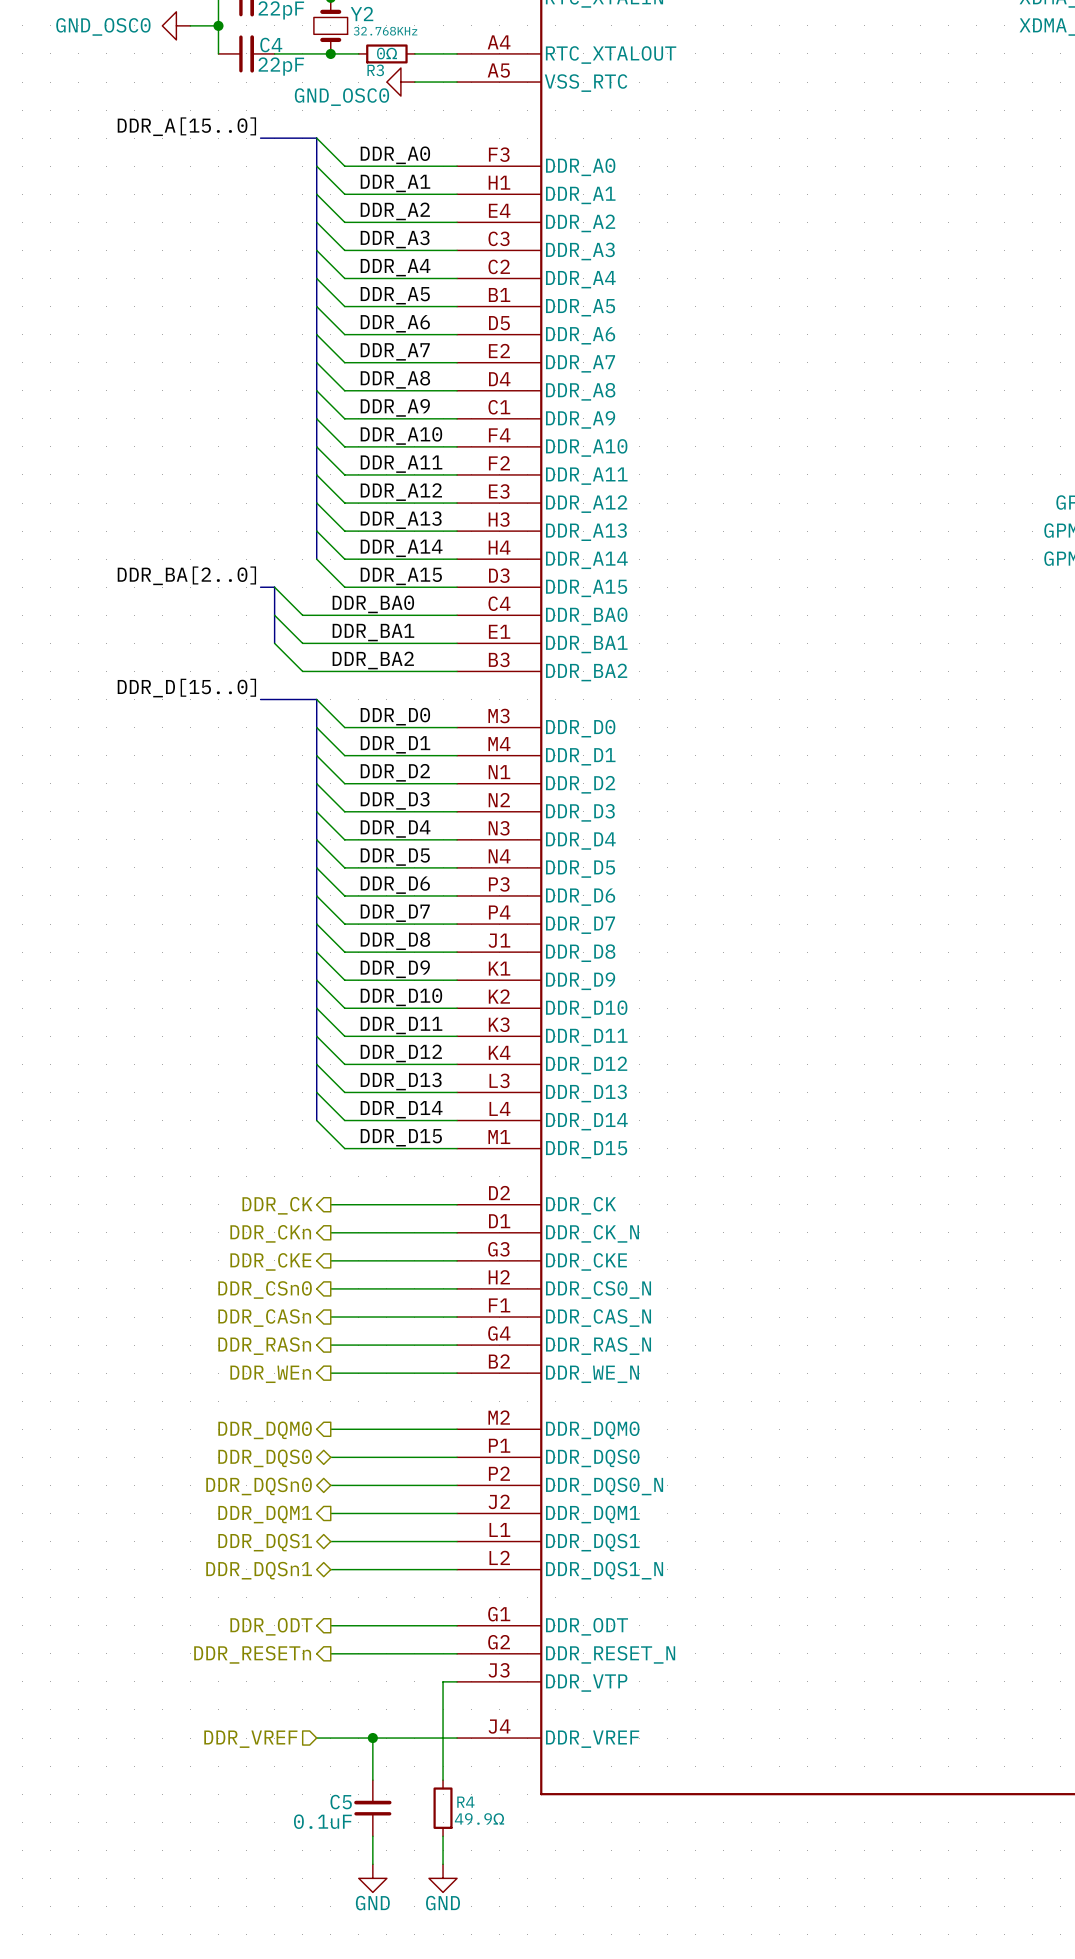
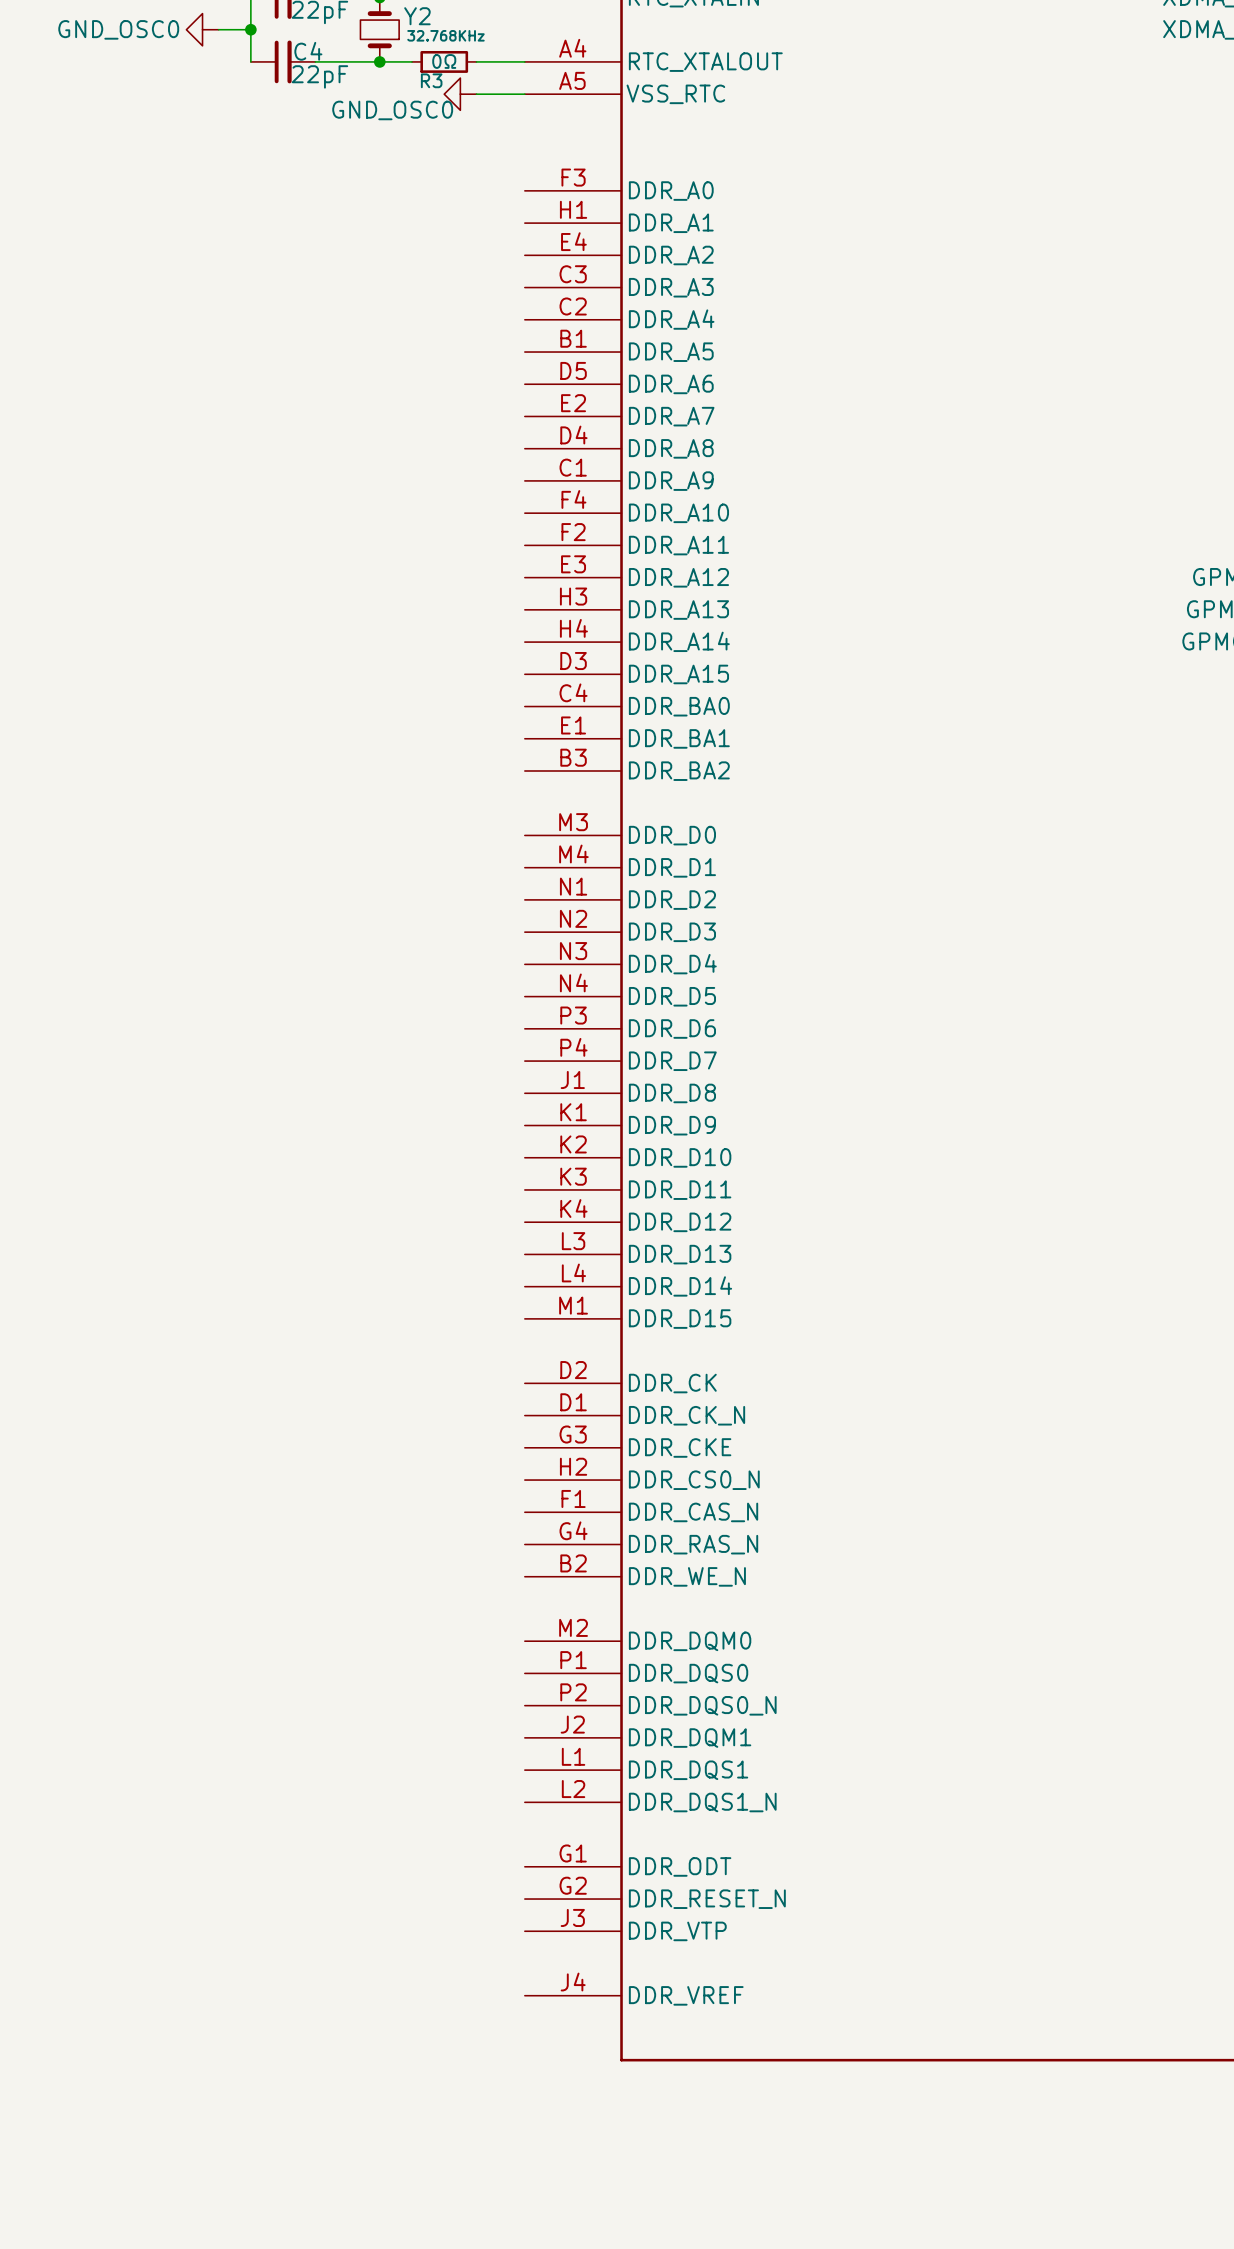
label: DDR_A[15..0] (186, 126) -> none
bus: (260, 138) (316, 138) (316, 559) -> none
wire: (316, 138) (344, 166) (457, 166) -> none
label: DDR_A0 (395, 155) -> none
wire: (316, 166) (344, 194) (457, 194) -> none
label: DDR_A1 (395, 183) -> none
wire: (316, 194) (344, 222) (457, 222) -> none
label: DDR_A2 (395, 211) -> none
wire: (316, 222) (344, 250) (457, 250) -> none
label: DDR_A3 (395, 239) -> none
wire: (316, 250) (344, 278) (457, 278) -> none
label: DDR_A4 (395, 267) -> none
wire: (316, 278) (344, 306) (457, 306) -> none
label: DDR_A5 (395, 295) -> none
wire: (316, 306) (344, 334) (457, 334) -> none
label: DDR_A6 (395, 323) -> none
wire: (316, 334) (344, 362) (457, 362) -> none
label: DDR_A7 (395, 351) -> none
wire: (316, 362) (344, 390) (457, 390) -> none
label: DDR_A8 (395, 379) -> none
wire: (316, 390) (344, 418) (457, 418) -> none
label: DDR_A9 (395, 407) -> none
wire: (316, 418) (344, 446) (457, 446) -> none
label: DDR_A10 (401, 435) -> none
wire: (316, 446) (344, 474) (457, 474) -> none
label: DDR_A11 (401, 464) -> none
wire: (316, 474) (344, 503) (457, 503) -> none
label: DDR_A12 (401, 492) -> none
wire: (316, 503) (344, 531) (457, 531) -> none
label: DDR_A13 (401, 520) -> none
wire: (316, 531) (344, 559) (457, 559) -> none
label: DDR_A14 (401, 548) -> none
wire: (316, 559) (344, 587) (457, 587) -> none
label: DDR_BA[2..0] (186, 575) -> none
label: DDR_A15 (401, 576) -> none
bus: (260, 587) (274, 587) (274, 643) -> none
wire: (274, 587) (302, 615) (457, 615) -> none
label: DDR_BA0 (373, 604) -> none
wire: (274, 615) (302, 643) (457, 643) -> none
label: DDR_BA1 (373, 632) -> none
wire: (274, 643) (302, 671) (457, 671) -> none
label: DDR_BA2 (373, 660) -> none
label: DDR_D[15..0] (186, 688) -> none
bus: (260, 699) (316, 699) (316, 1120) -> none
wire: (316, 699) (344, 727) (457, 727) -> none
label: DDR_D0 (395, 716) -> none
wire: (316, 727) (344, 755) (457, 755) -> none
label: DDR_D1 (395, 744) -> none
wire: (316, 755) (344, 783) (457, 783) -> none
label: DDR_D2 (395, 772) -> none
wire: (316, 783) (344, 811) (457, 811) -> none
label: DDR_D3 (395, 800) -> none
wire: (316, 811) (344, 839) (457, 839) -> none
label: DDR_D4 (395, 829) -> none
wire: (316, 839) (344, 867) (457, 867) -> none
label: DDR_D5 (395, 857) -> none
wire: (316, 867) (344, 895) (457, 895) -> none
label: DDR_D6 (395, 885) -> none
wire: (316, 895) (344, 924) (457, 924) -> none
label: DDR_D7 (395, 913) -> none
wire: (316, 924) (344, 952) (457, 952) -> none
label: DDR_D8 (395, 941) -> none
wire: (316, 952) (344, 980) (457, 980) -> none
label: DDR_D9 (395, 969) -> none
wire: (316, 980) (344, 1008) (457, 1008) -> none
label: DDR_D10 (401, 997) -> none
wire: (316, 1008) (344, 1036) (457, 1036) -> none
label: DDR_D11 (401, 1025) -> none
wire: (316, 1036) (344, 1064) (457, 1064) -> none
label: DDR_D12 (401, 1053) -> none
wire: (316, 1064) (344, 1092) (457, 1092) -> none
label: DDR_D13 (401, 1081) -> none
wire: (316, 1092) (344, 1120) (457, 1120) -> none
label: DDR_D14 (401, 1109) -> none
wire: (316, 1120) (344, 1148) (457, 1148) -> none
label: DDR_D15 (401, 1137) -> none
wire: (330, 1204) (457, 1204) -> none
hierarchical label: DDR_CK (277, 1205) -> none
wire: (330, 1232) (457, 1232) -> none
hierarchical label: DDR_CKn (270, 1233) -> none
wire: (330, 1260) (457, 1260) -> none
hierarchical label: DDR_CKE (270, 1261) -> none
wire: (330, 1288) (457, 1288) -> none
hierarchical label: DDR_CSn0 (265, 1289) -> none
wire: (330, 1317) (457, 1317) -> none
hierarchical label: DDR_CASn (264, 1318) -> none
wire: (330, 1345) (457, 1345) -> none
hierarchical label: DDR_RASn (264, 1346) -> none
wire: (330, 1373) (457, 1373) -> none
hierarchical label: DDR_WEn (270, 1374) -> none
wire: (330, 1429) (457, 1429) -> none
hierarchical label: DDR_DQM0 (265, 1430) -> none
wire: (330, 1457) (457, 1457) -> none
hierarchical label: DDR_DQS0 (265, 1458) -> none
wire: (330, 1485) (457, 1485) -> none
hierarchical label: DDR_DQSn0 (259, 1486) -> none
wire: (330, 1513) (457, 1513) -> none
hierarchical label: DDR_DQM1 (265, 1514) -> none
wire: (330, 1541) (457, 1541) -> none
hierarchical label: DDR_DQS1 (265, 1542) -> none
wire: (330, 1569) (457, 1569) -> none
hierarchical label: DDR_DQSn1 (259, 1570) -> none
wire: (330, 1625) (457, 1625) -> none
hierarchical label: DDR_ODT (271, 1626) -> none
wire: (330, 1653) (457, 1653) -> none
hierarchical label: DDR_RESETn (252, 1654) -> none
wire: (457, 1681) (443, 1681) (443, 1780) -> none
wire: (316, 1738) (457, 1738) -> none
wire: (372, 1738) (372, 1780) -> none
junction: (372, 1738) -> none
hierarchical label: DDR_VREF (250, 1739) -> none
C5: 0.1uF (372, 1808) -> none
R4: 49.9Ω (443, 1808) -> none
wire: (372, 1836) (372, 1864) -> none
wire: (443, 1836) (443, 1864) -> none
power symbol: GND (372, 1878) -> none
power symbol: GND (443, 1878) -> none

